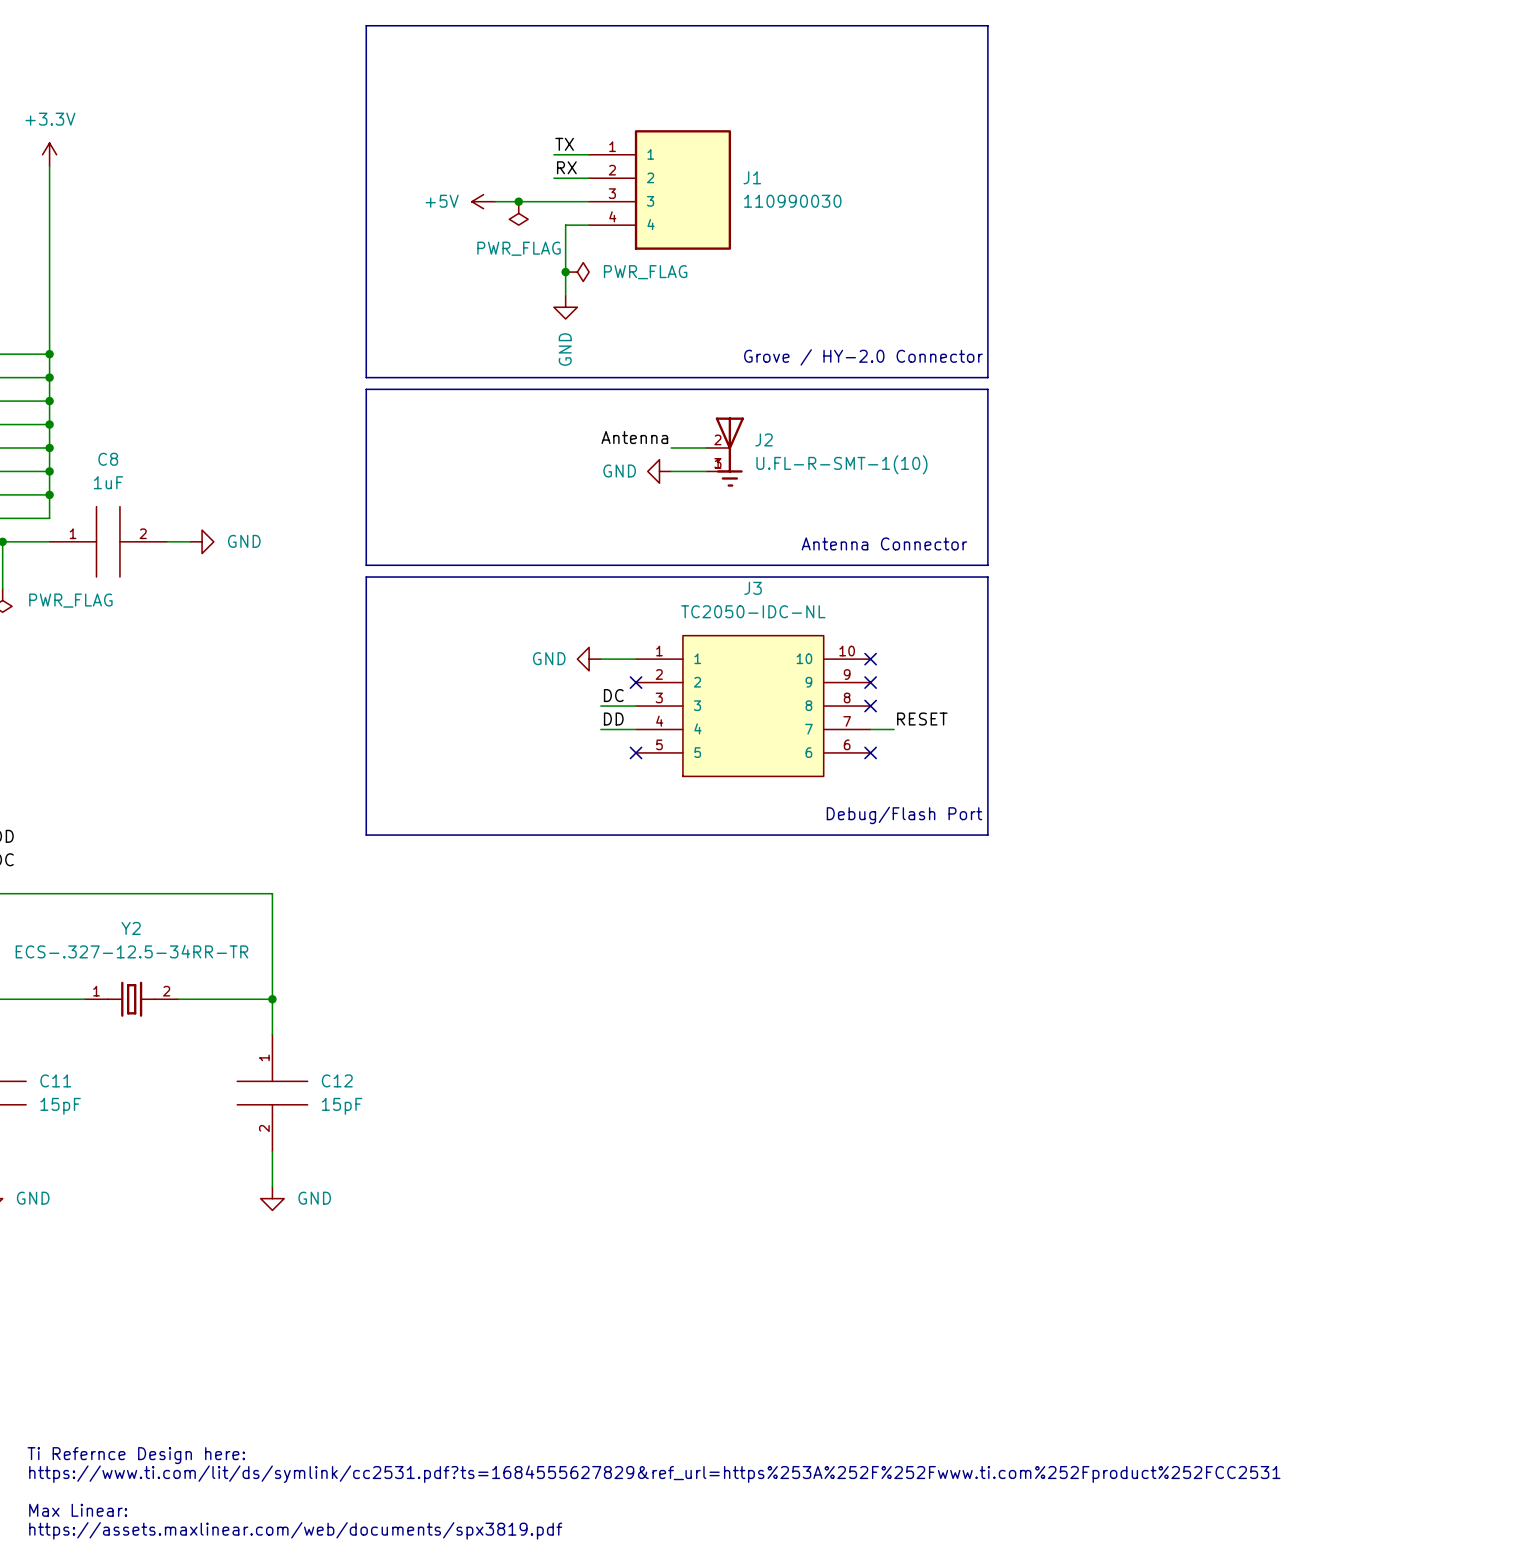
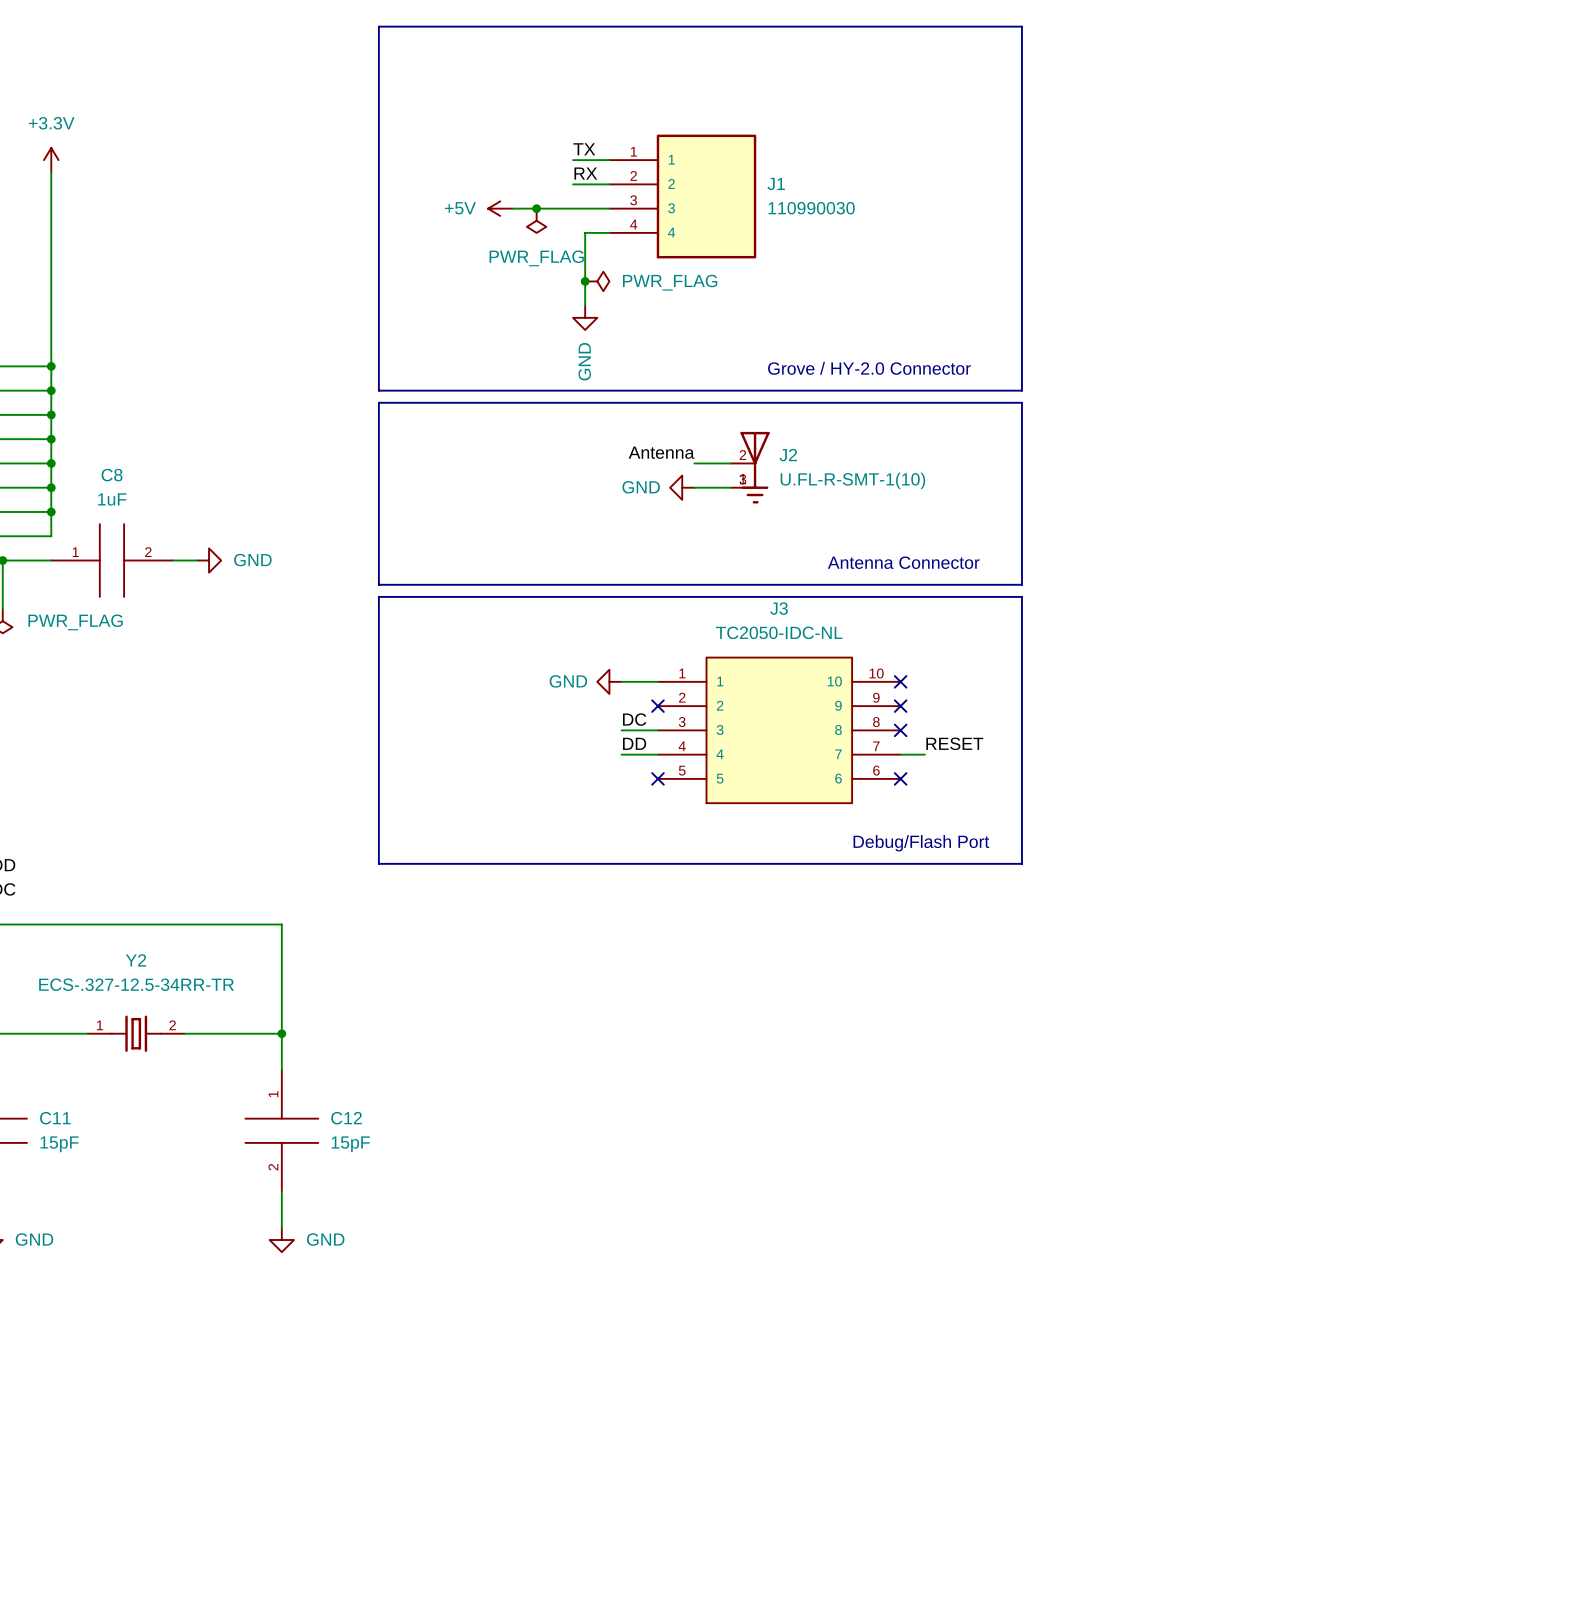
text: Ti Refernce Design here: (136, 1455) -> none
text: https://www.ti.com/lit/ds/symlink/cc2531.pdf?ts=1684555627829&ref_url=https%253A%252F%252Fwww.ti.com%252Fproduct%252FCC2531 (654, 1474) -> none
text: Max Linear: (78, 1510) -> none
text: https://assets.maxlinear.com/web/documents/spx3819.pdf (295, 1530) -> none

